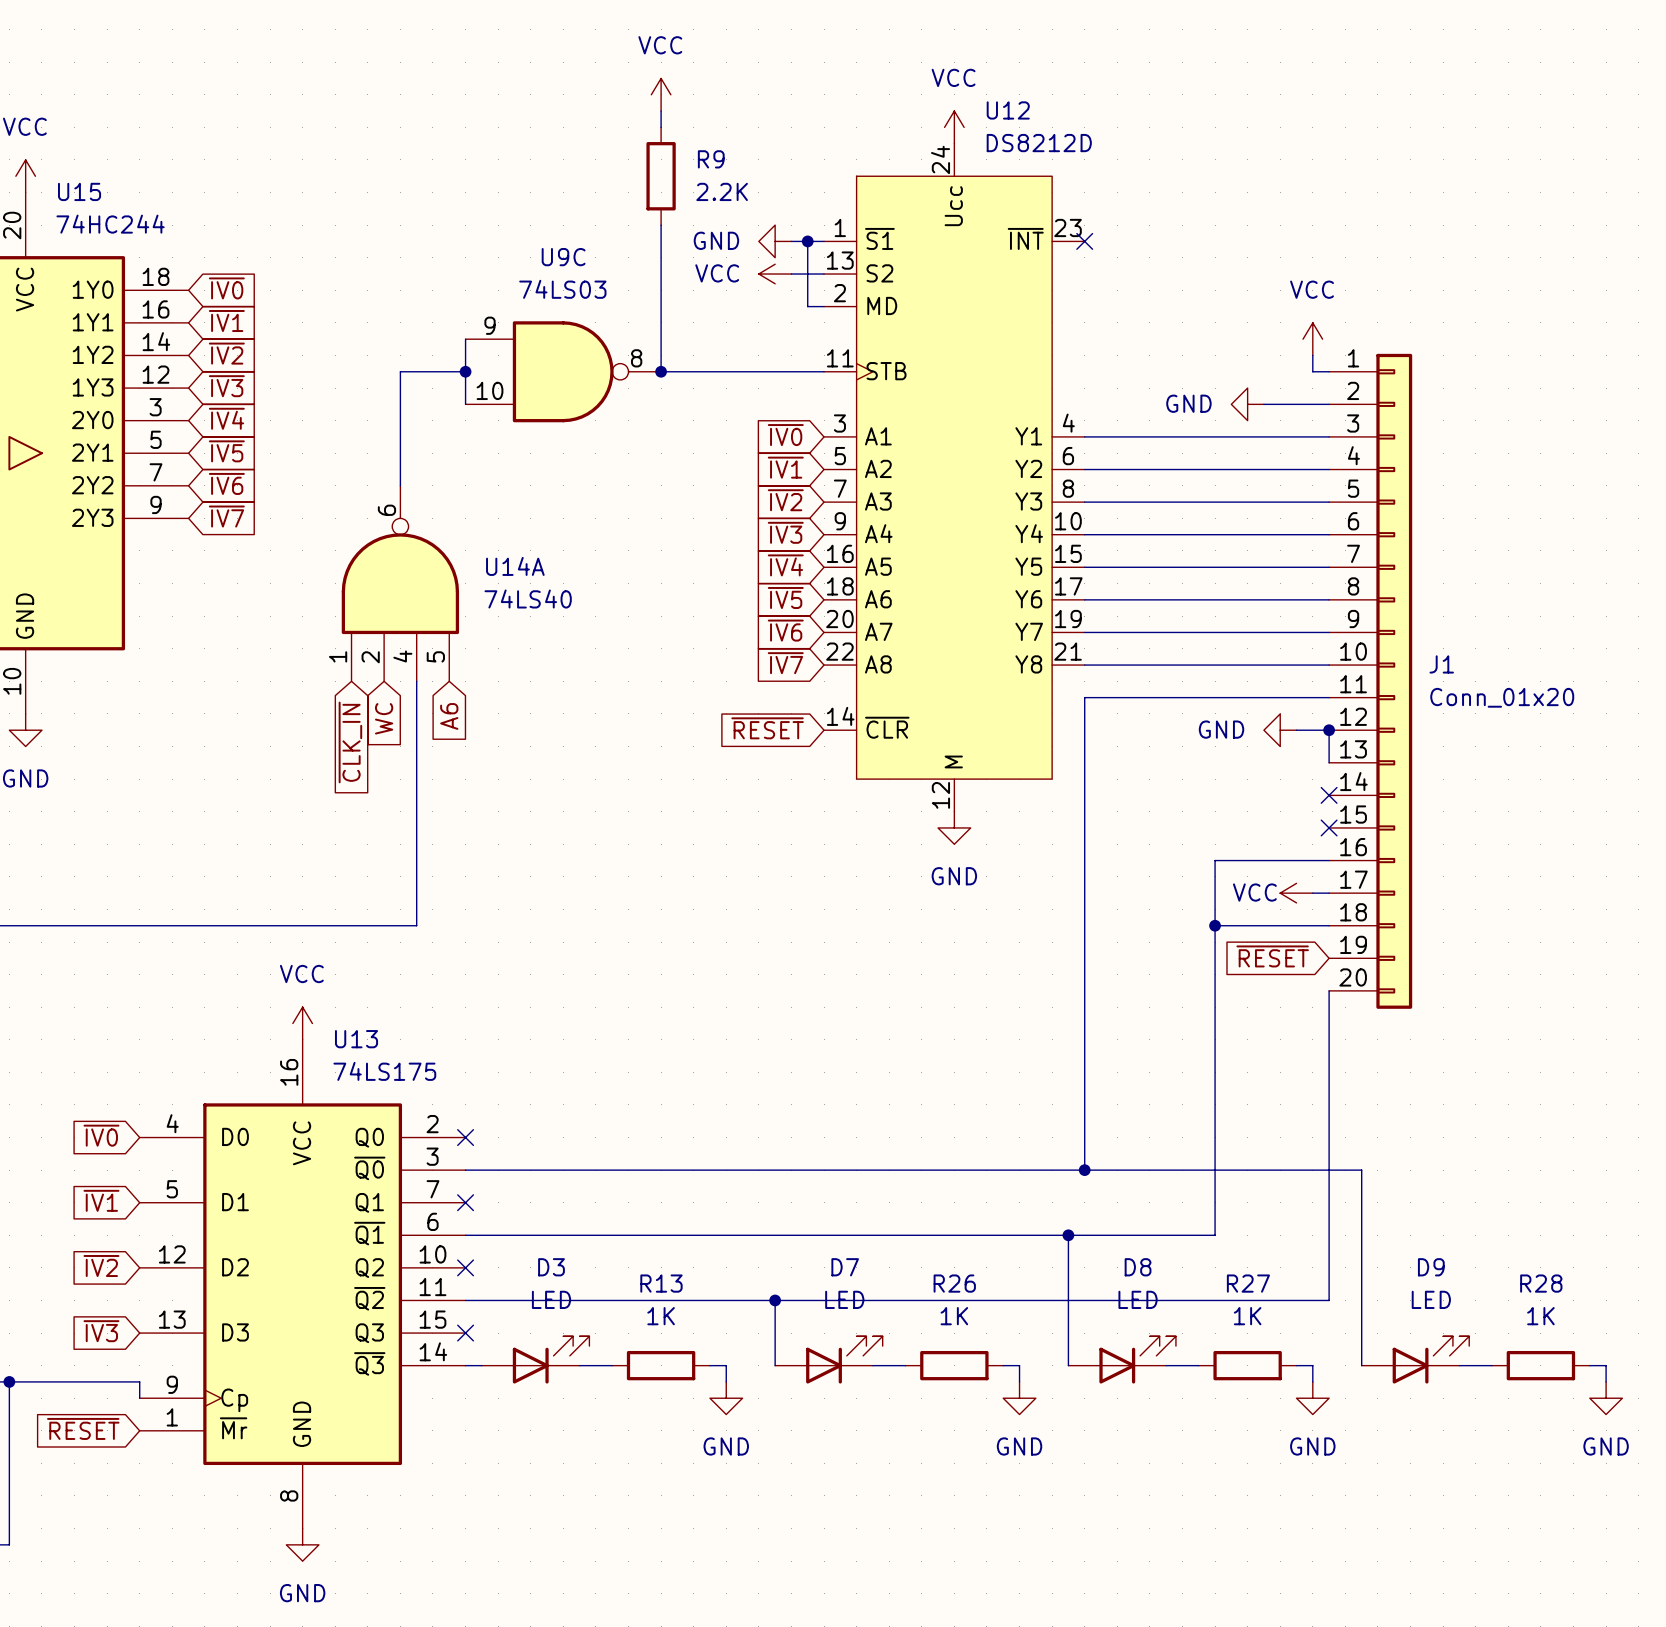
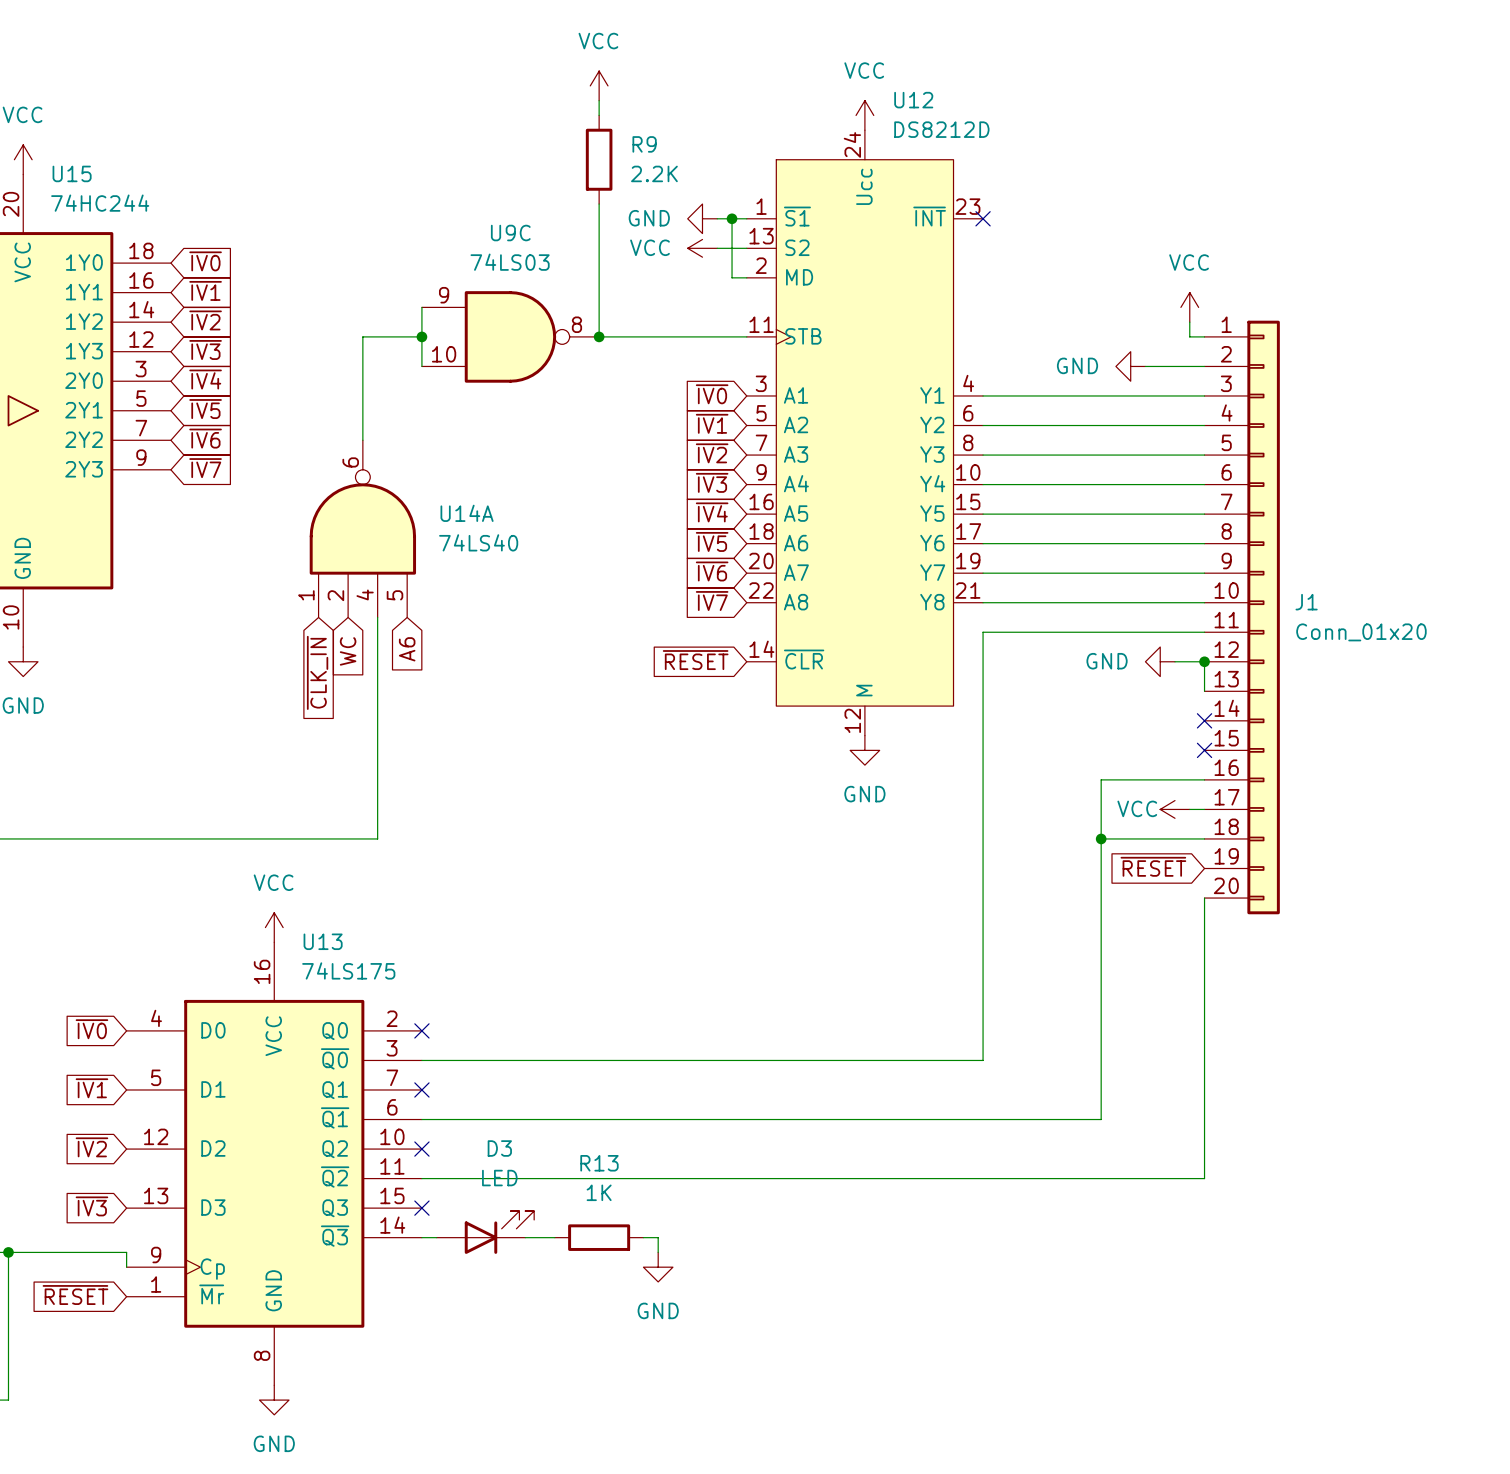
wire: (1084, 1170) (1361, 1170) (1361, 1365) -> none
junction: (1084, 1170) -> none
wire: (1068, 1235) (1068, 1365) -> none
junction: (1068, 1235) -> none
wire: (775, 1300) (775, 1365) -> none
junction: (775, 1300) -> none
D7: LED (828, 1359) -> none
D8: LED (1122, 1359) -> none
D9: LED (1415, 1359) -> none
wire: (872, 1365) (905, 1365) -> none
R26: 1K (954, 1365) -> none
wire: (1003, 1365) (1019, 1365) (1019, 1381) -> none
wire: (1166, 1365) (1198, 1365) -> none
R27: 1K (1247, 1365) -> none
wire: (1296, 1365) (1312, 1365) (1312, 1381) -> none
wire: (1459, 1365) (1492, 1365) -> none
R28: 1K (1540, 1365) -> none
wire: (1589, 1365) (1606, 1365) (1606, 1381) -> none
power symbol: GND (1019, 1398) -> none
power symbol: GND (1312, 1398) -> none
power symbol: GND (1606, 1398) -> none

